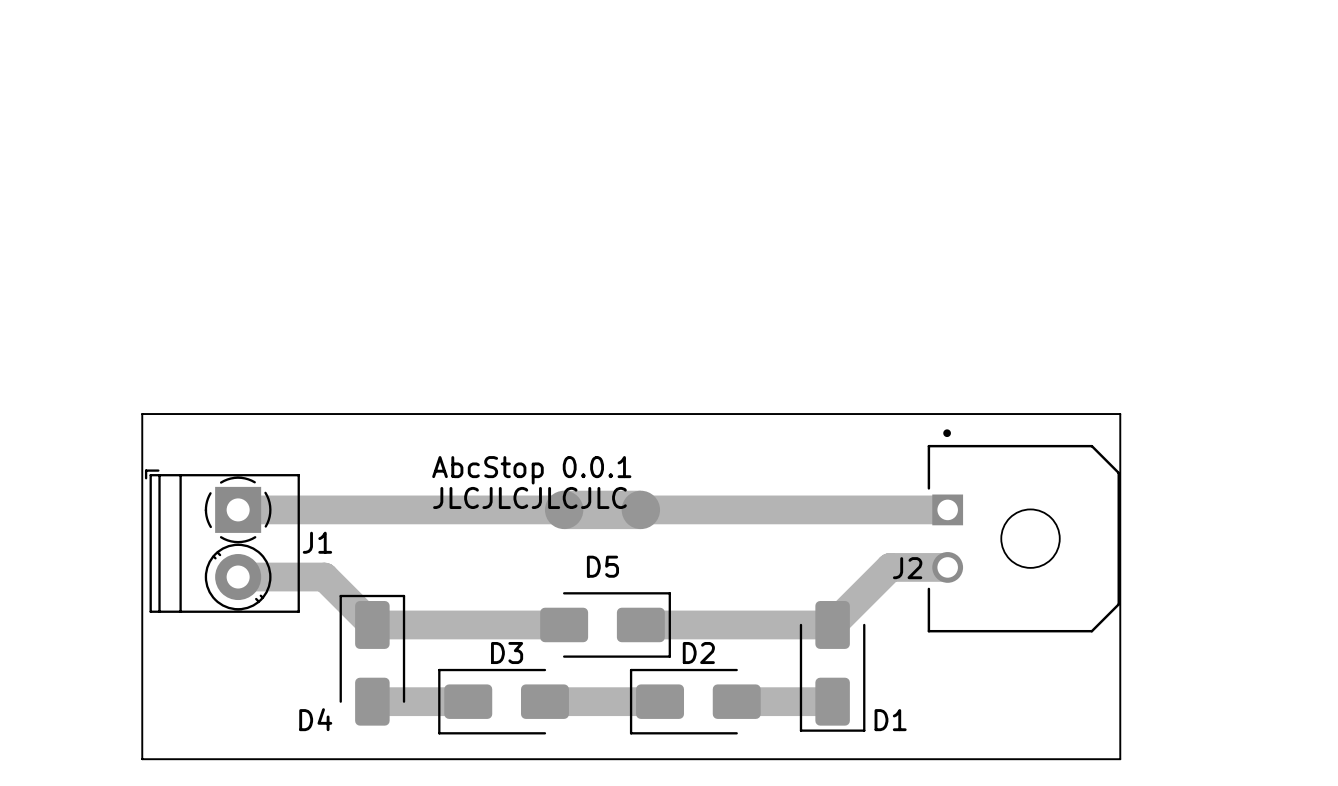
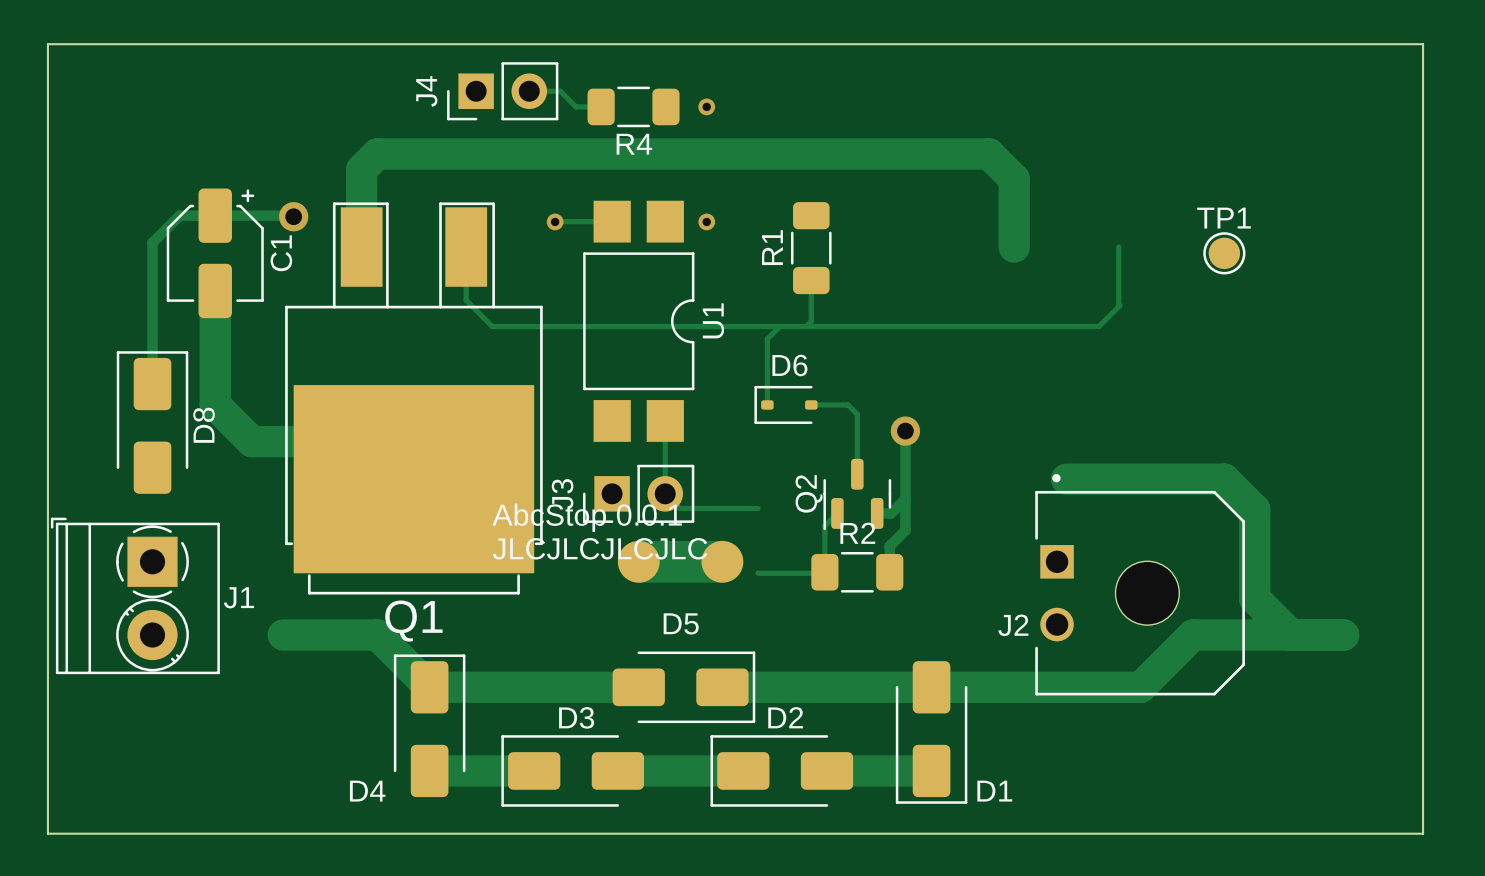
J4: none -> (502, 91)
track: none -> (529, 91) (560, 91) (576, 106) (601, 106)
R4: none -> (633, 106)
via: none -> (706, 106)
track: none -> (293, 216) (179, 215) (152, 242) (152, 384)
via: none -> (293, 216)
track: none -> (612, 221) (555, 221)
via: none -> (555, 221)
via: none -> (706, 221)
track: none -> (361, 247) (361, 169) (377, 153) (989, 153) (1014, 179) (1014, 247)
track: none -> (466, 247) (466, 300) (492, 326) (1098, 326) (1119, 305) (1118, 247)
R1: none -> (811, 248)
C1: none -> (215, 253)
TP1: none -> (1224, 253)
track: none -> (811, 280) (811, 321) (806, 326)
track: none -> (215, 290) (215, 404) (251, 441) (413, 441)
U1: none -> (638, 321)
track: none -> (779, 326) (767, 339) (767, 404)
Q1: none -> (413, 398)
D6: none -> (786, 404)
track: none -> (811, 404) (847, 404) (857, 414) (857, 474)
track: none -> (665, 421) (665, 493) (679, 508) (757, 508)
D8: none -> (152, 422)
track: none -> (905, 431) (905, 530) (889, 546) (889, 572) (894, 567)
via: none -> (905, 431)
track: none -> (1066, 479) (1224, 479) (1254, 509) (1254, 598) (1291, 635)
J3: none -> (638, 493)
Q2: none -> (857, 494)
track: none -> (905, 499) (891, 513) (877, 513)
track: none -> (837, 513) (824, 526) (823, 573) (757, 573)
track: (238, 509) (564, 509) -> none
track: (640, 509) (947, 509) -> none
R2: none -> (857, 572)
J1 position: (222, 541) -> (135, 595)
track: (947, 567) (890, 567) (832, 624) -> (1343, 635) (1192, 635) (1140, 687) (931, 687)
board edge: (142, 759) (142, 414) (1120, 414) (1120, 759) -> (178, 833) (47, 833) (47, 44) (1423, 44) (1423, 833) (1245, 833)

